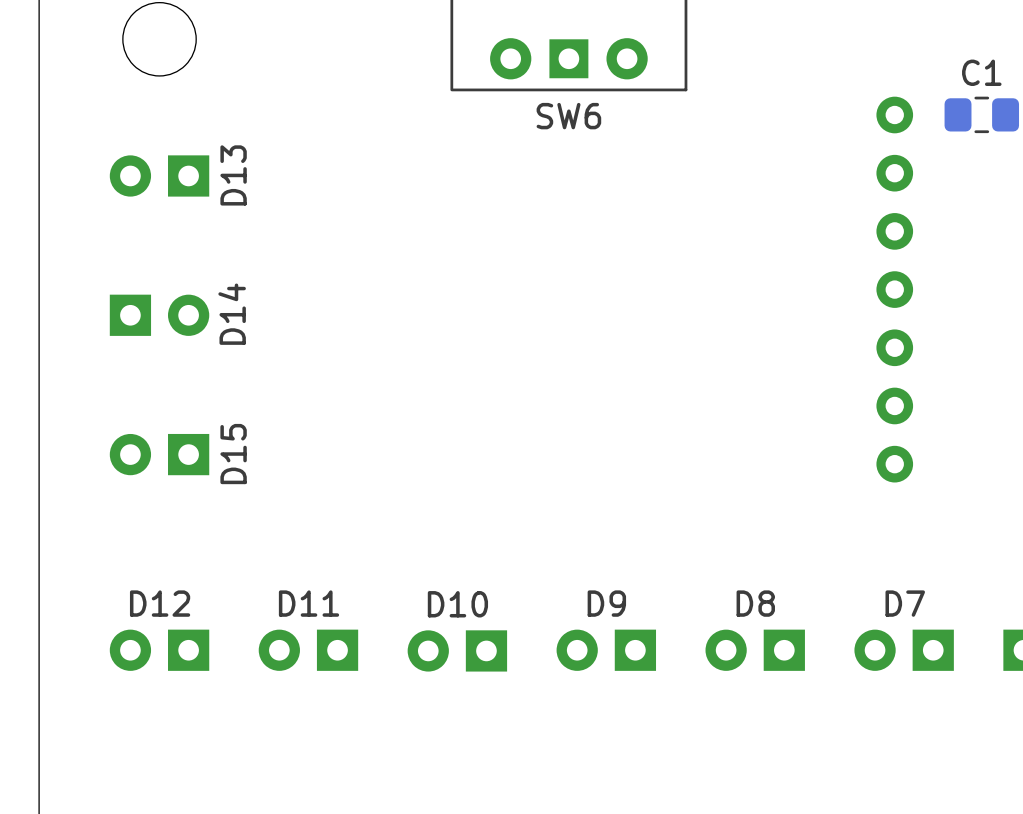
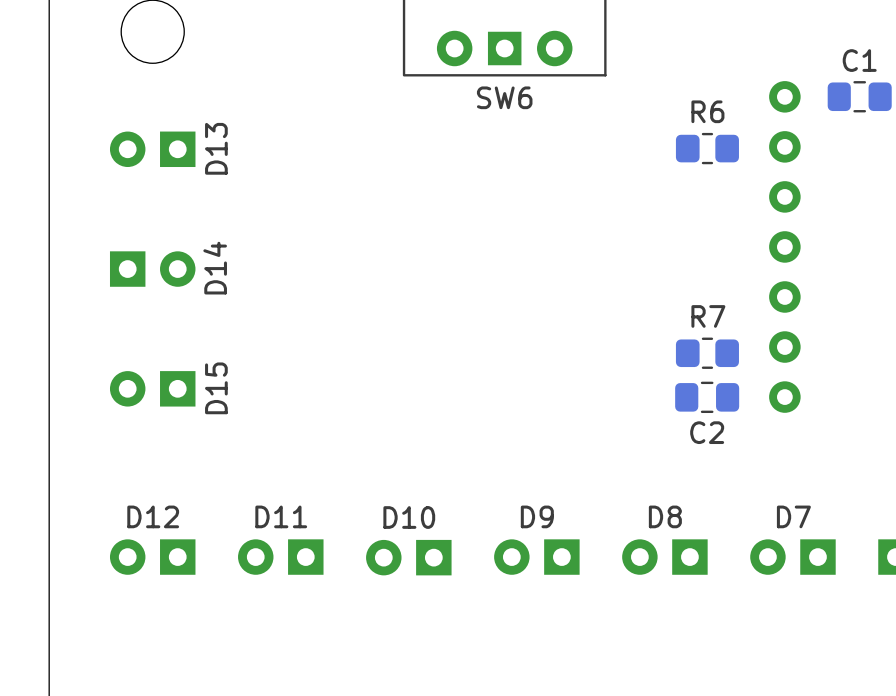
R6: none -> (707, 148)
R7: none -> (707, 353)
C2: none -> (707, 397)

